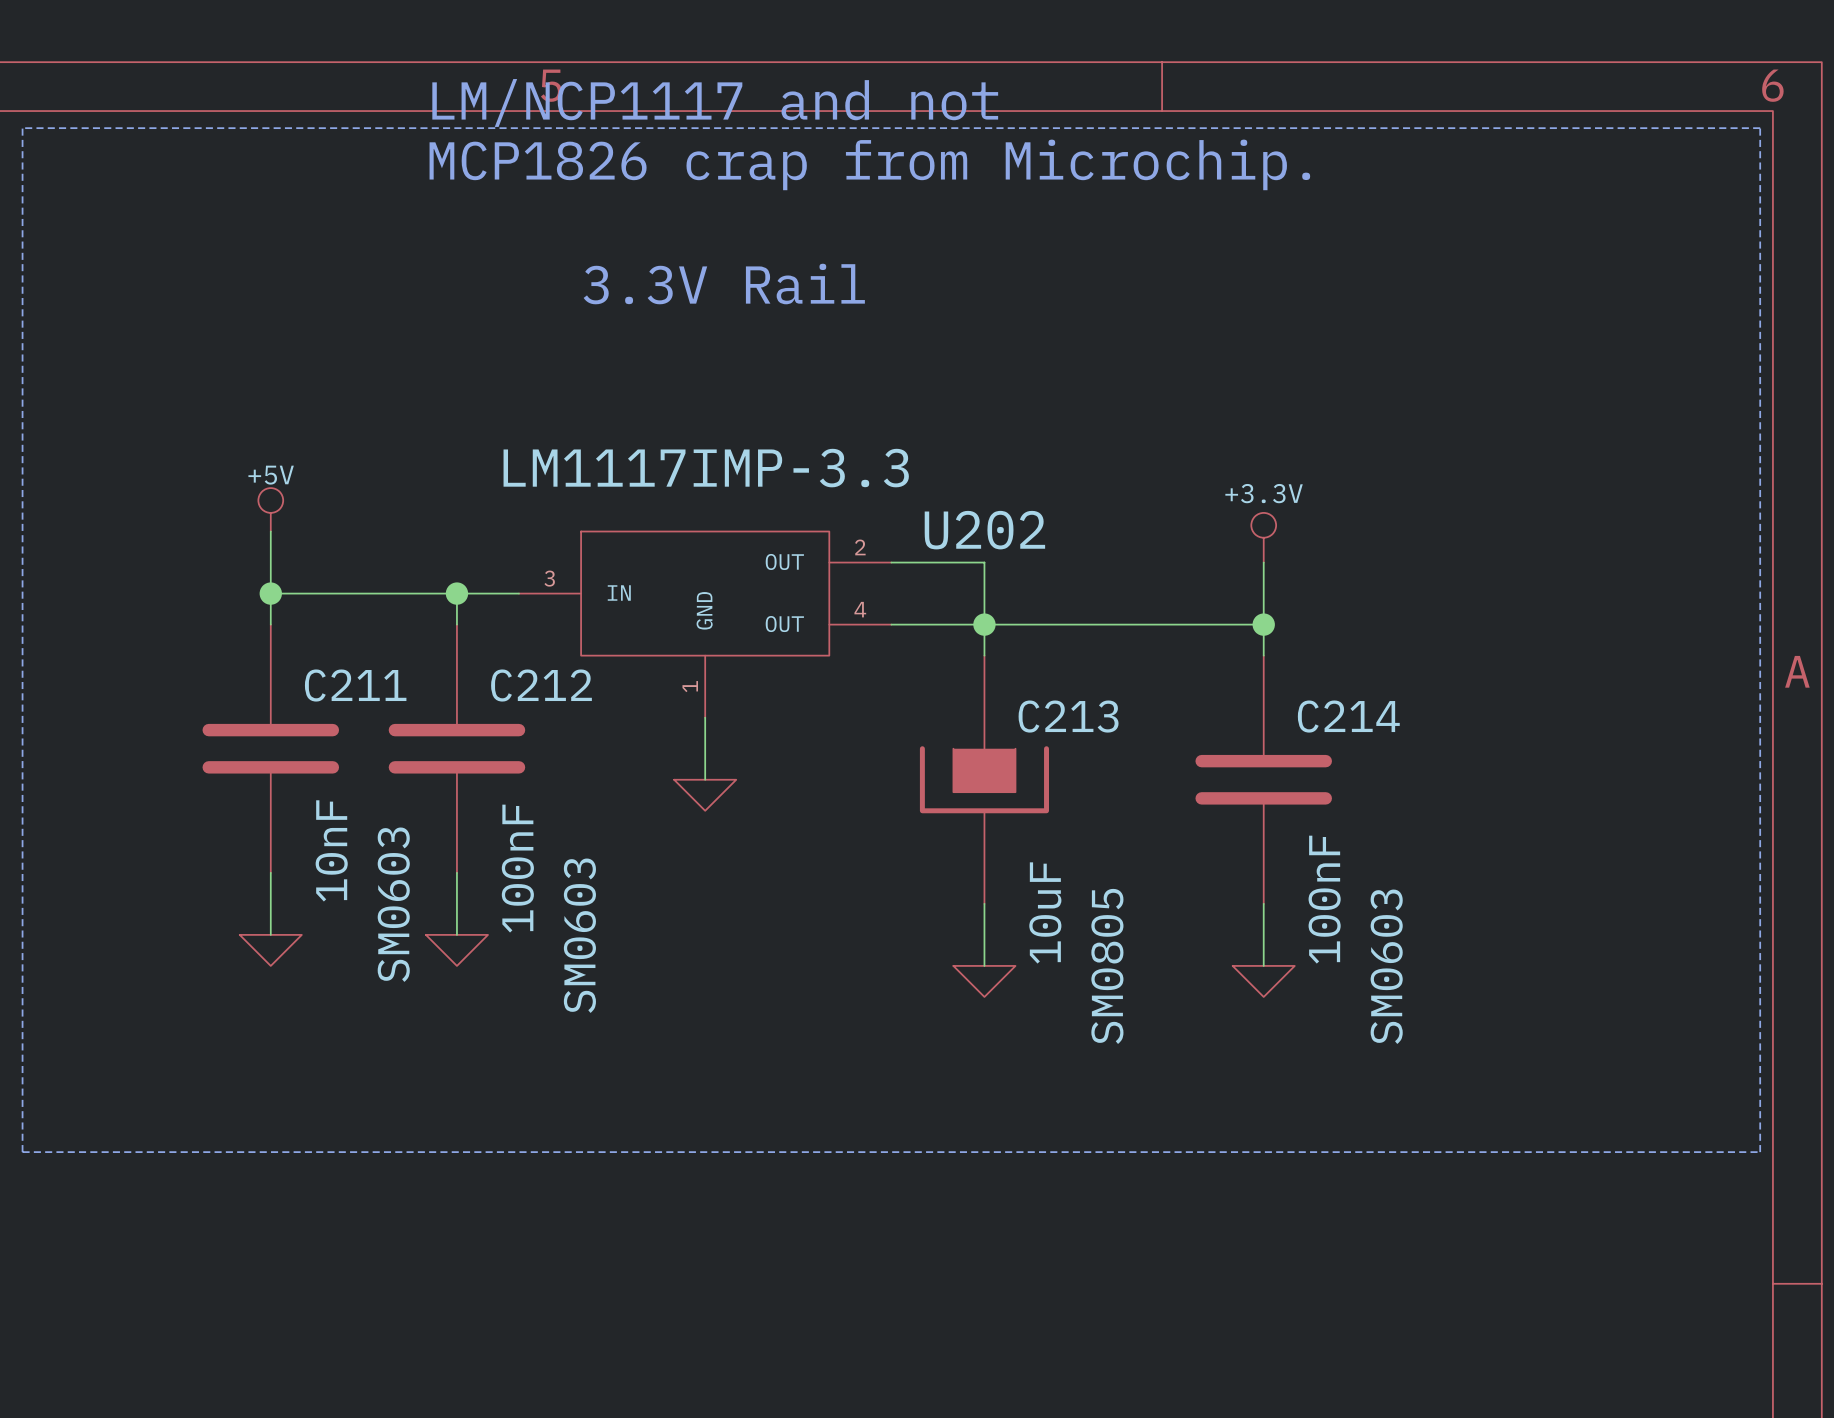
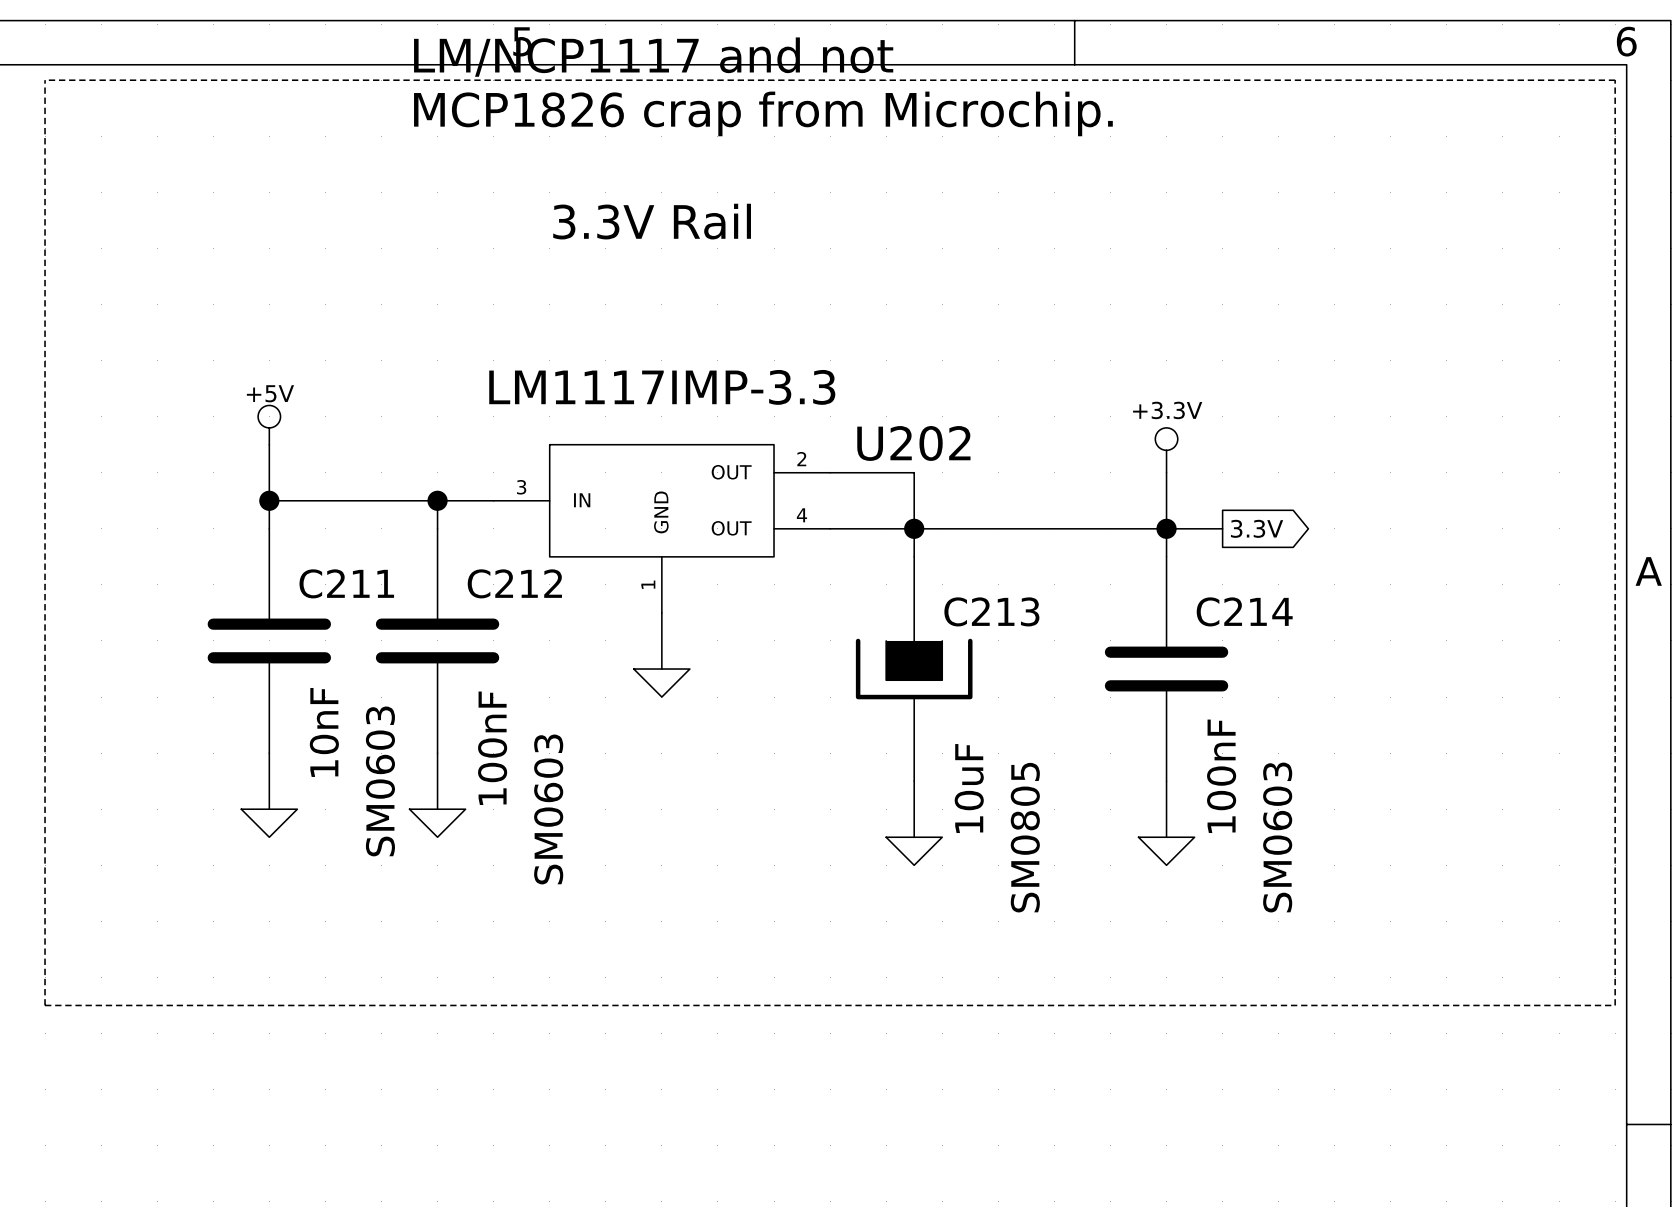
wire: none -> (1166, 528) (1222, 528)
global label: none -> 3.3V (1257, 528)

